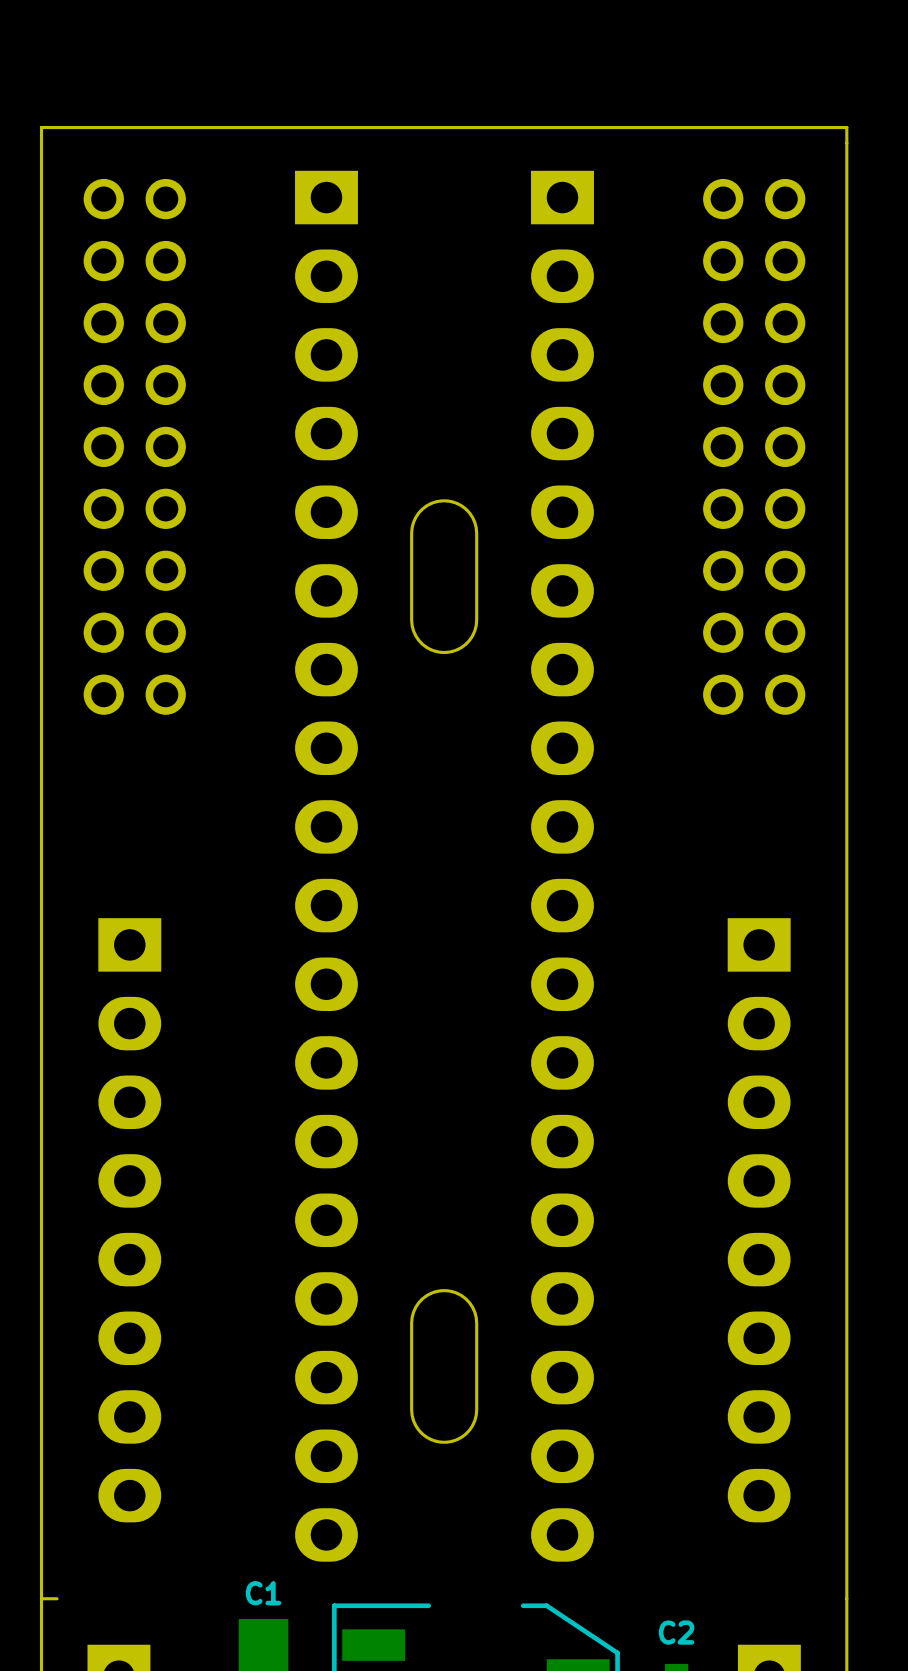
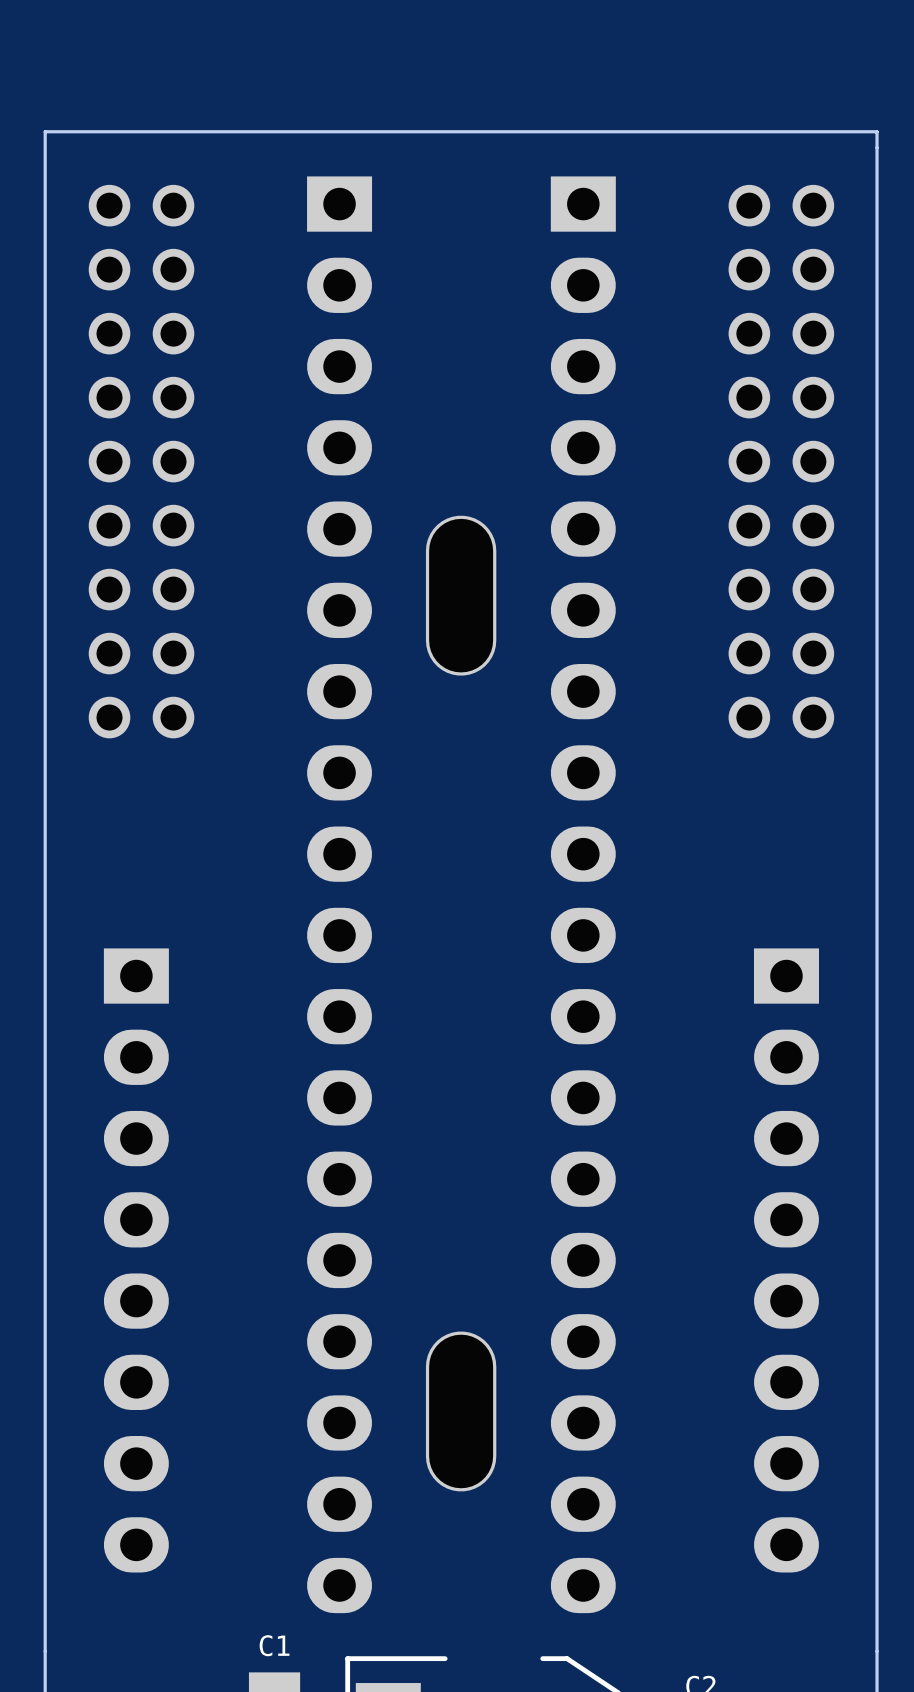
board edge: (57, 1598) (41, 1598) -> none

